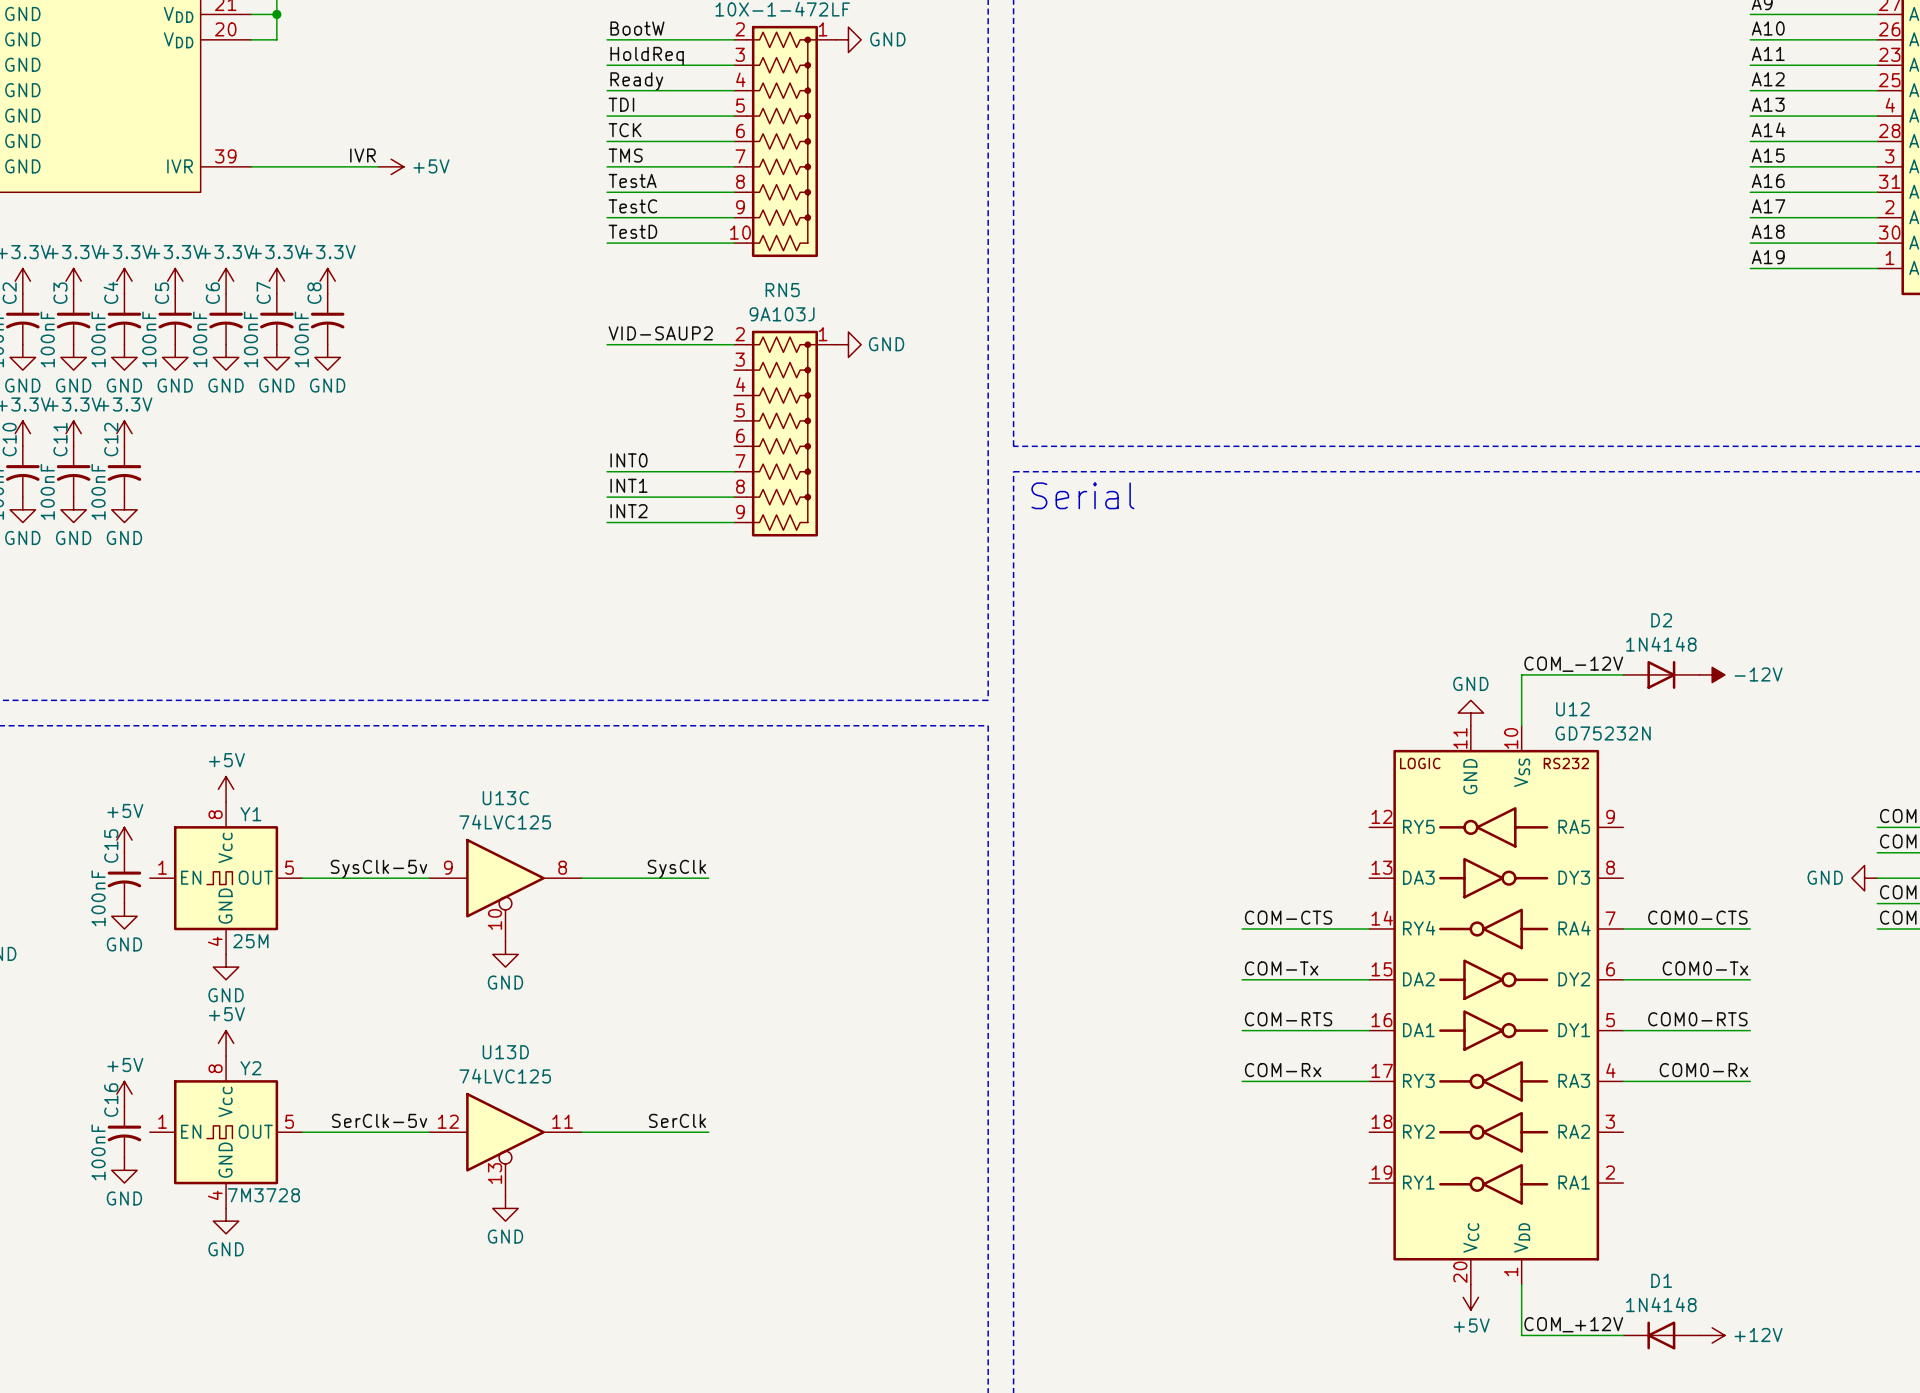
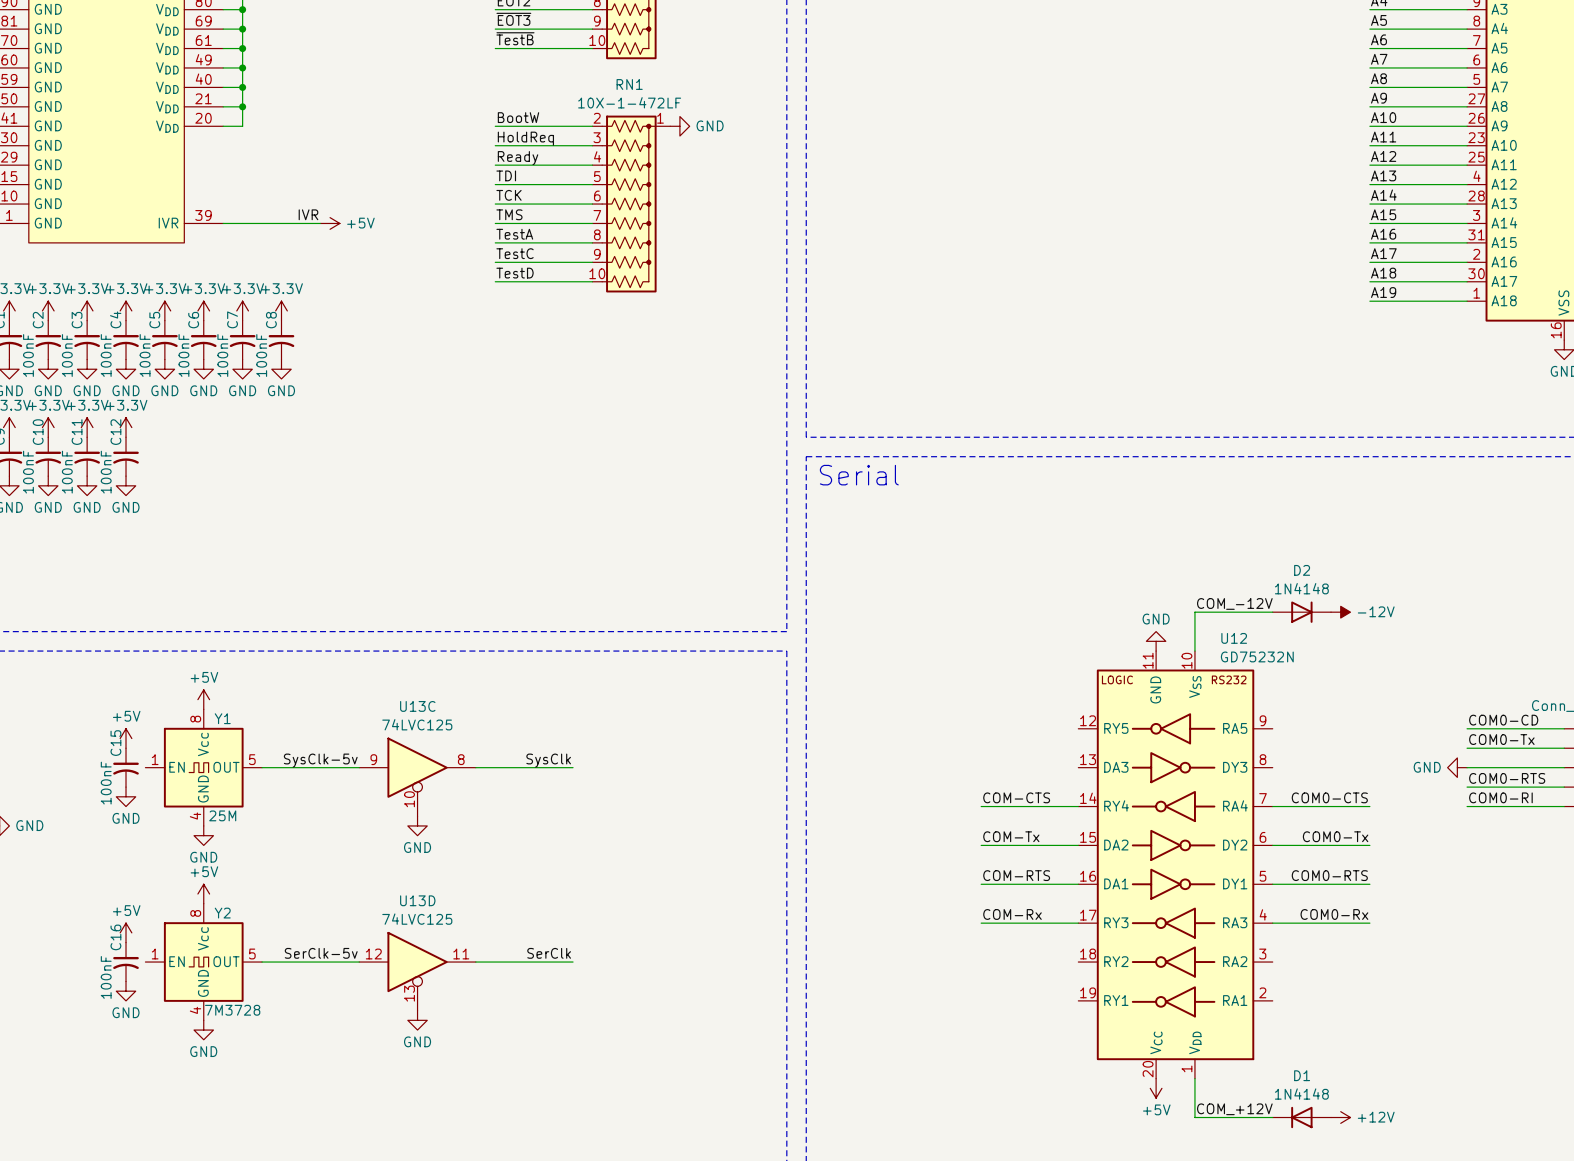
label: VID-SAUP2 (660, 333) -> none
wire: (607, 344) (734, 344) -> none
power symbol: GND (848, 344) -> none
RN5: 9A103J (784, 433) -> none
label: INT0 (628, 460) -> none
wire: (607, 471) (734, 471) -> none
label: INT1 (628, 485) -> none
wire: (607, 497) (734, 497) -> none
label: INT2 (628, 511) -> none
wire: (607, 522) (734, 522) -> none

